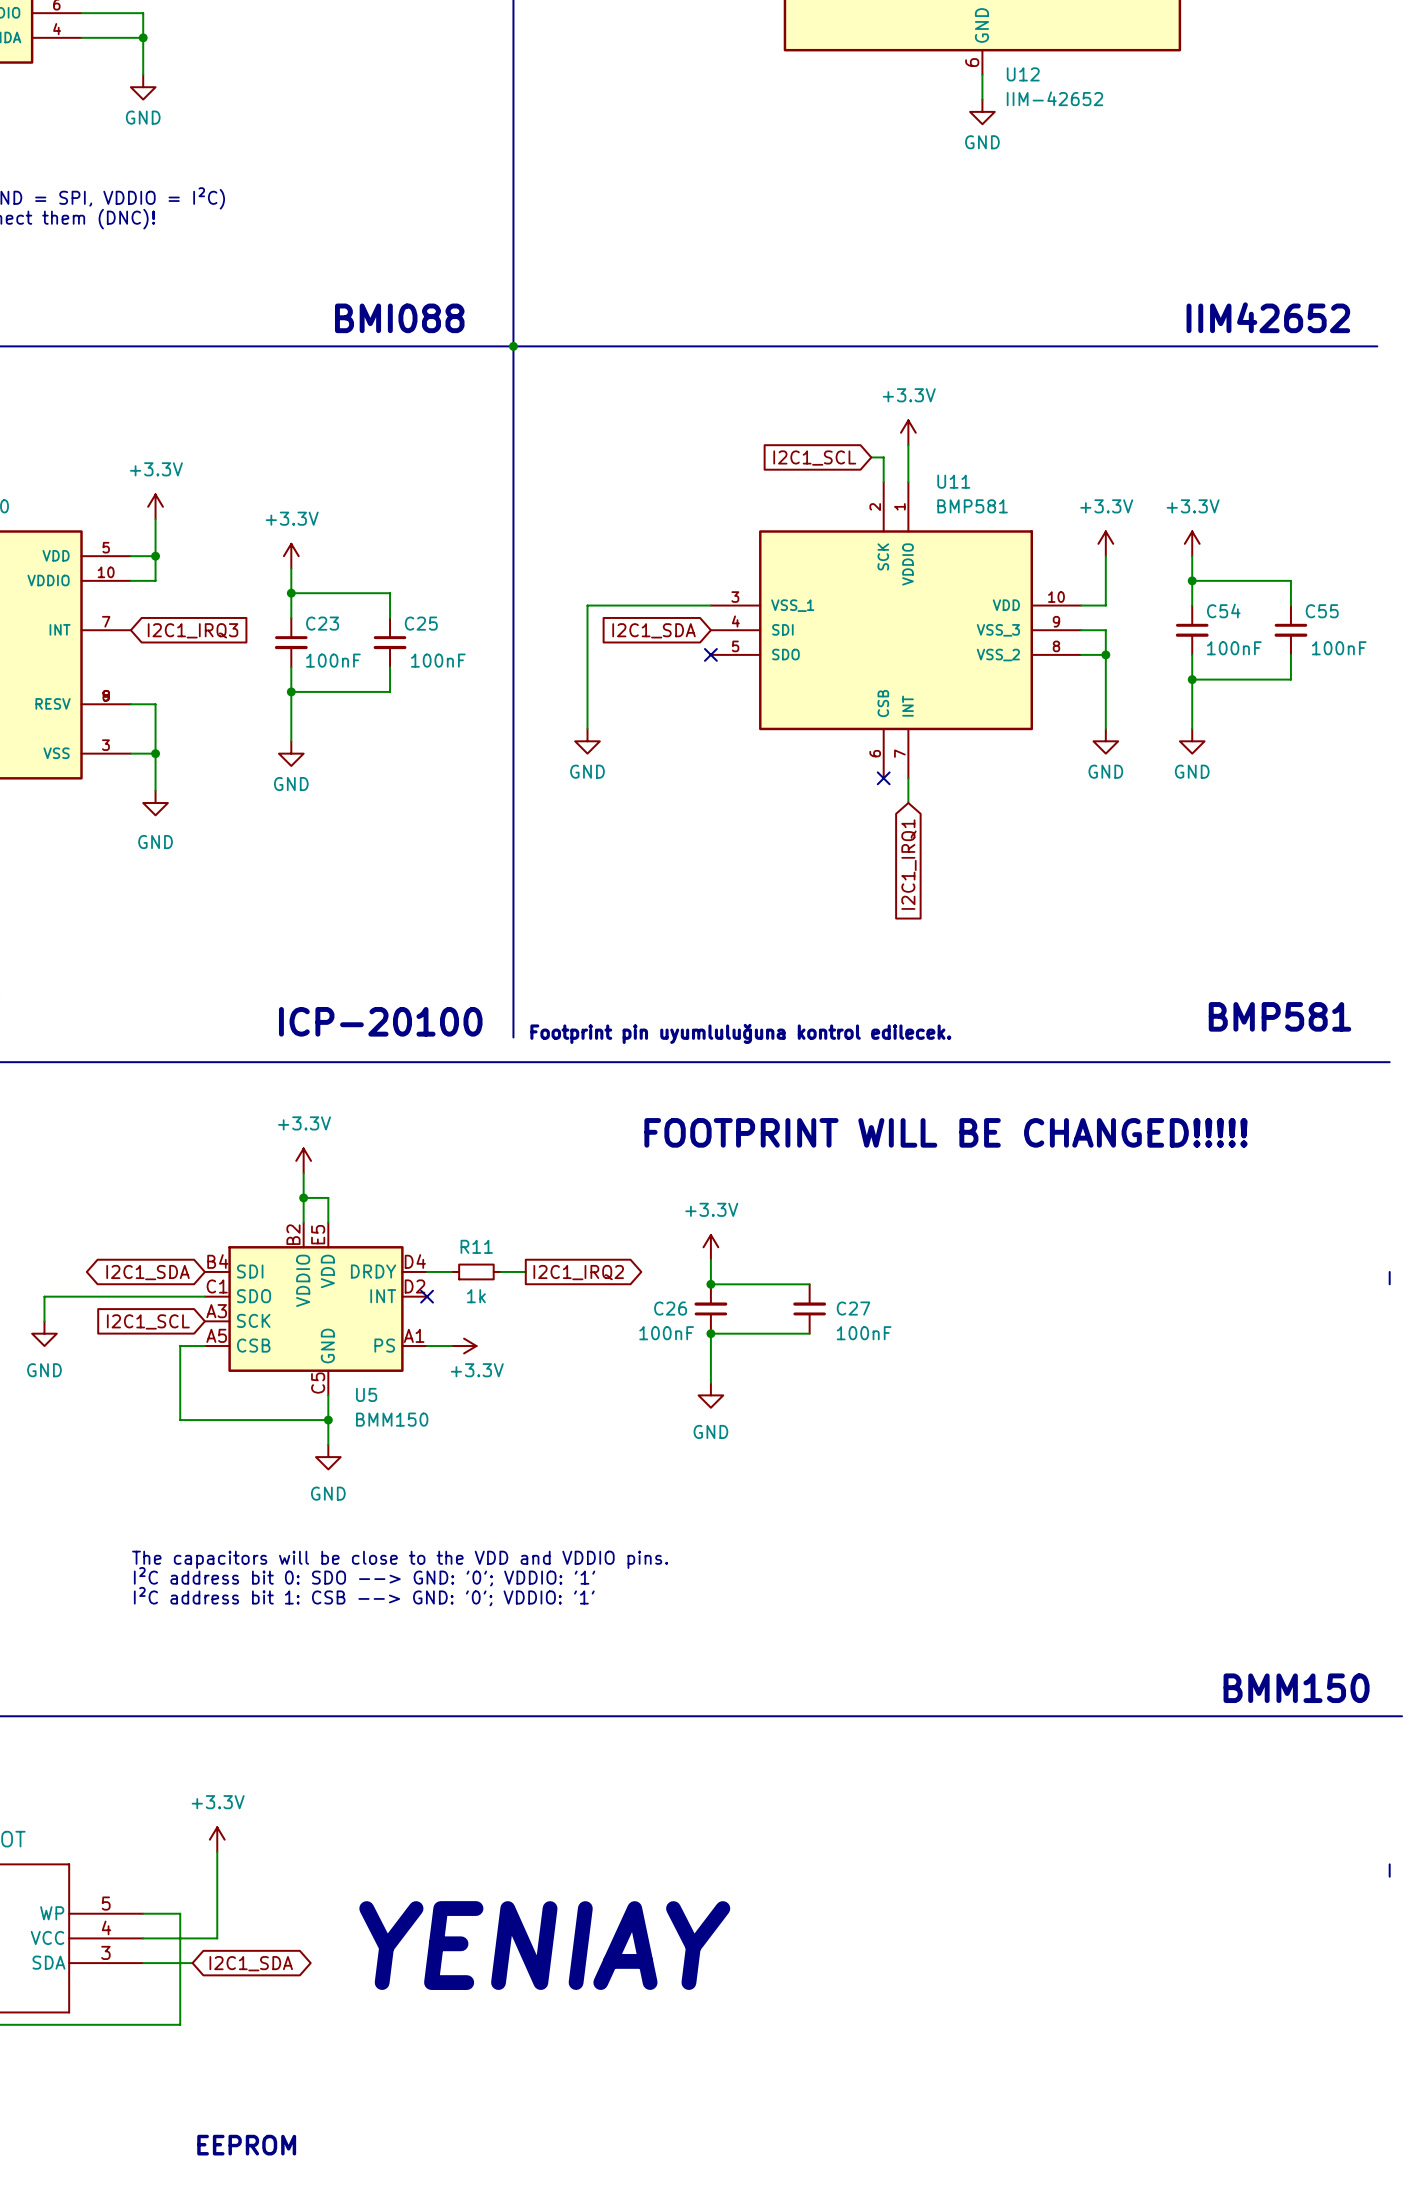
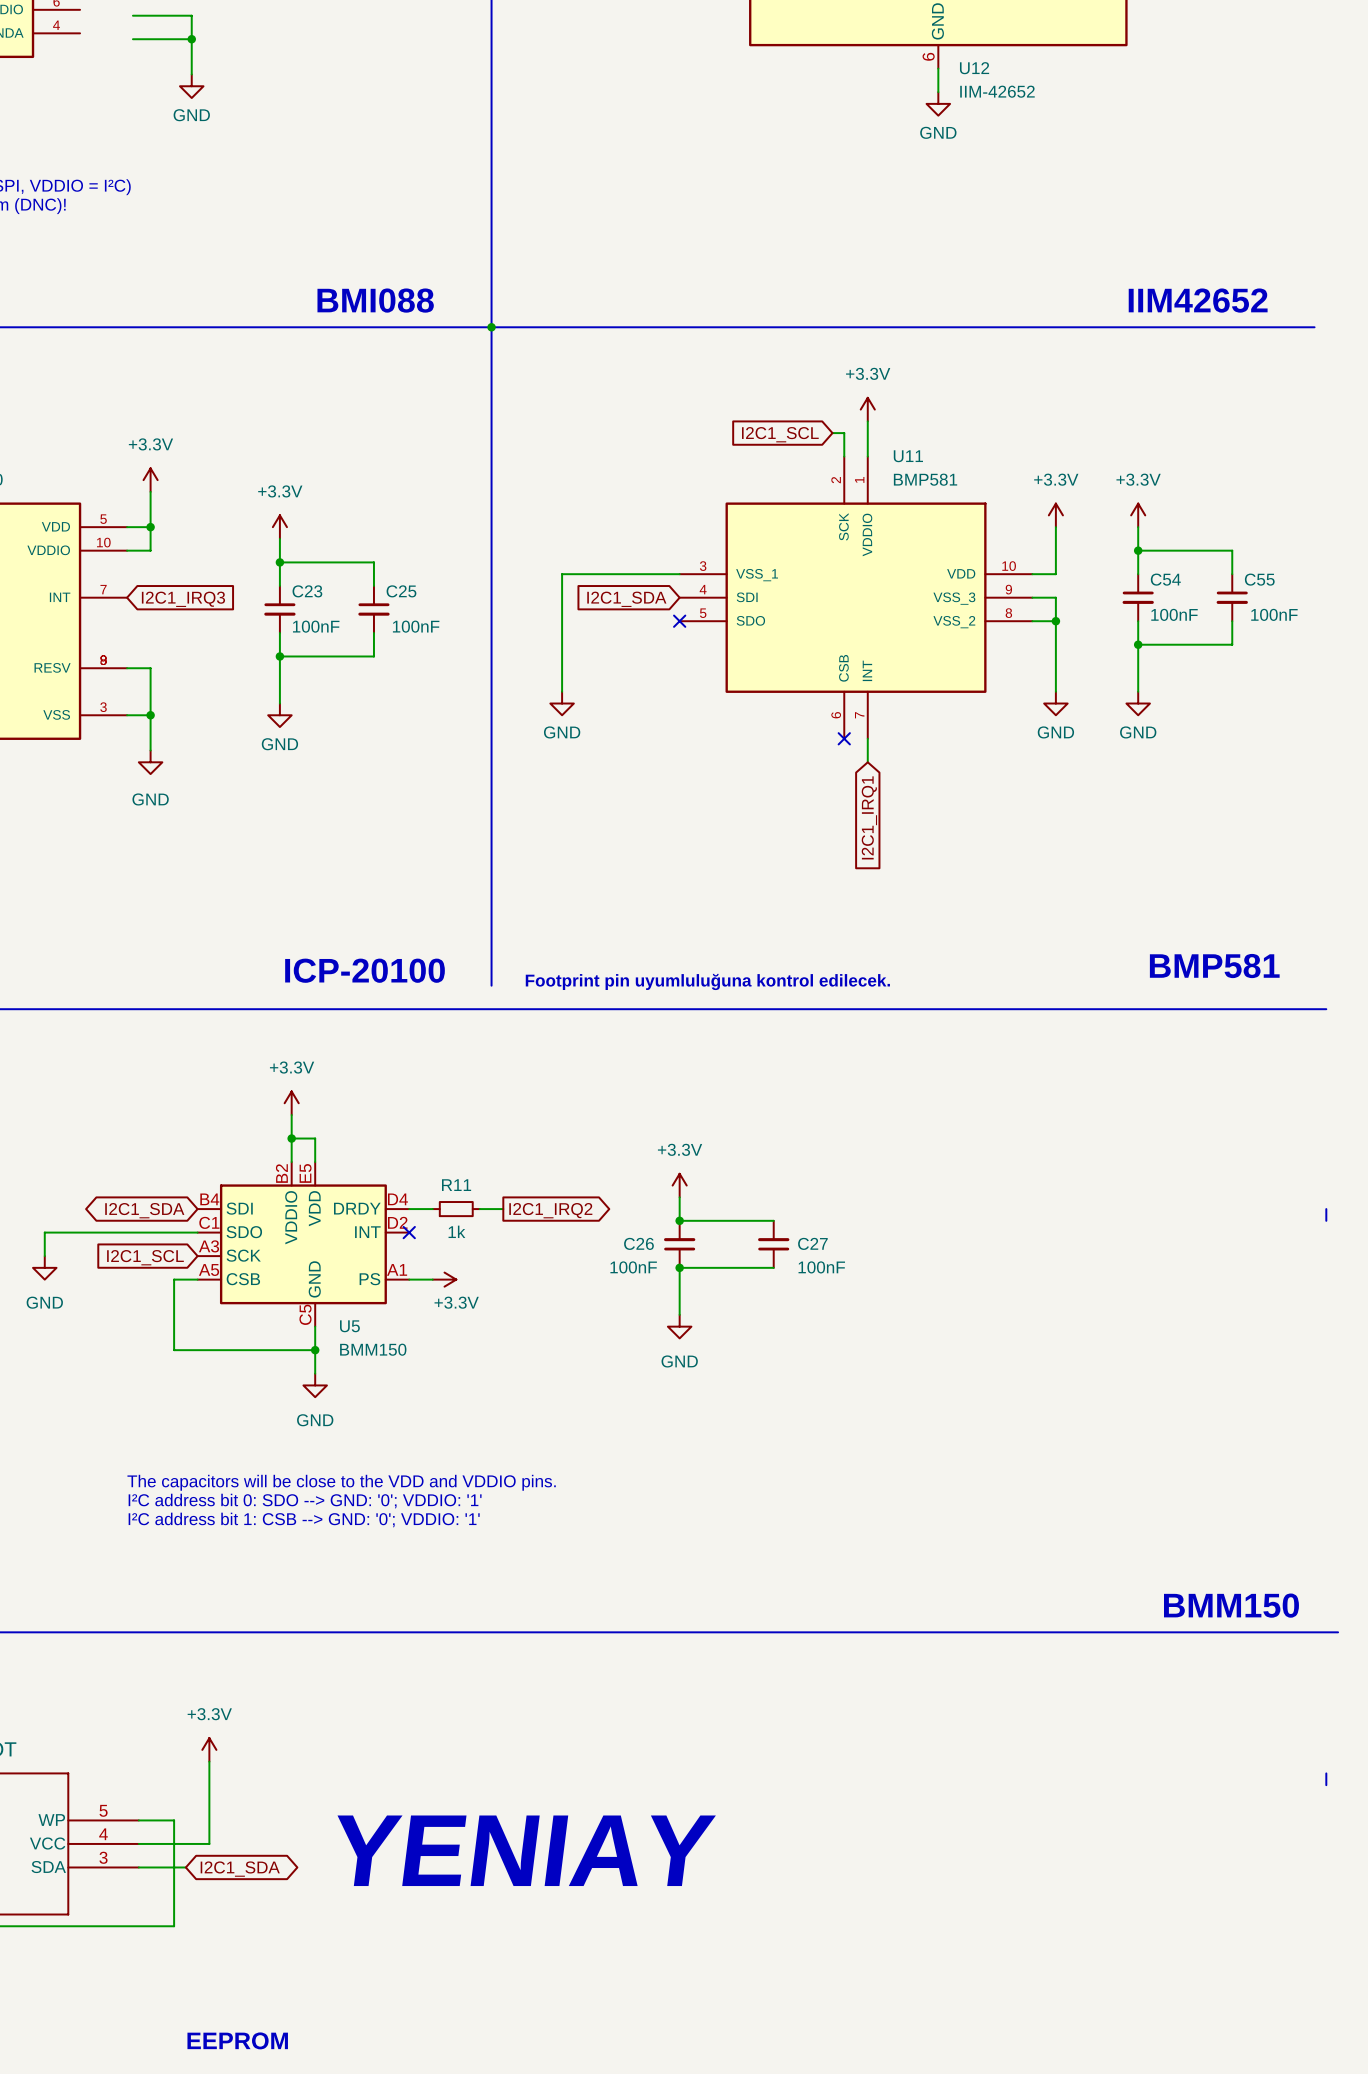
wire: (81, 13) (143, 13) (143, 74) -> (132, 15) (191, 15) (191, 74)
wire: (81, 37) (143, 37) -> (132, 39) (191, 39)
junction position: (143, 37) -> (191, 39)
power symbol position: GND (143, 87) -> GND (191, 86)
text: FOOTPRINT WILL BE CHANGED!!!!! (945, 1132) -> none

